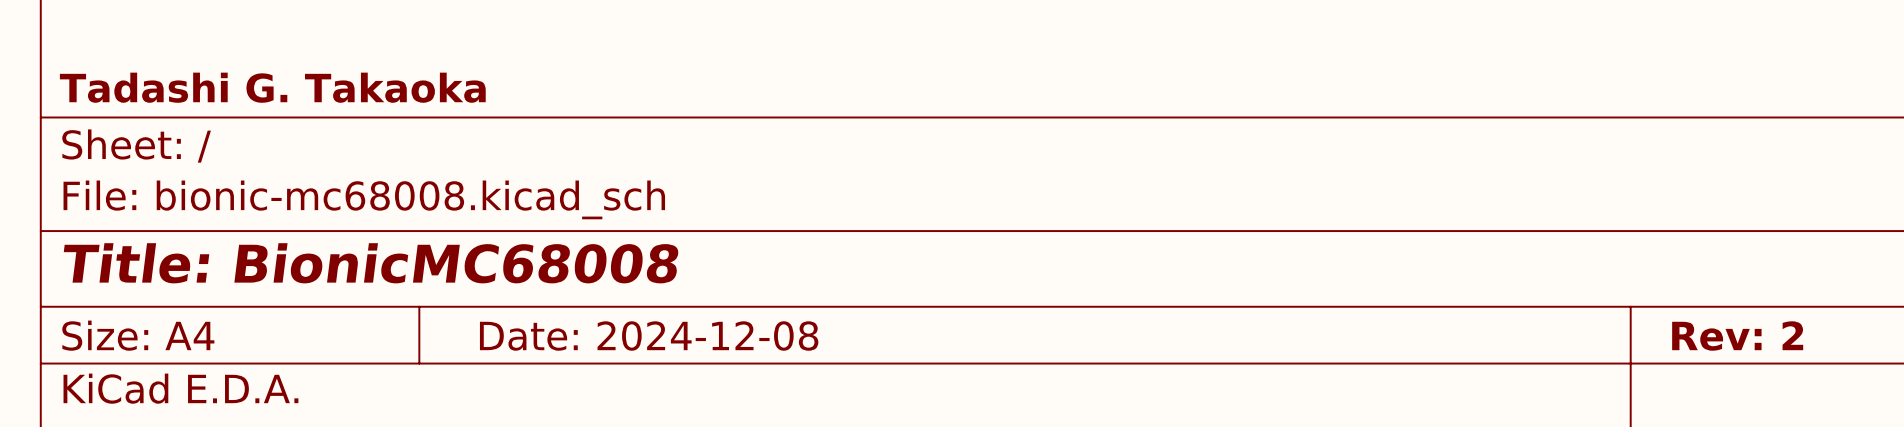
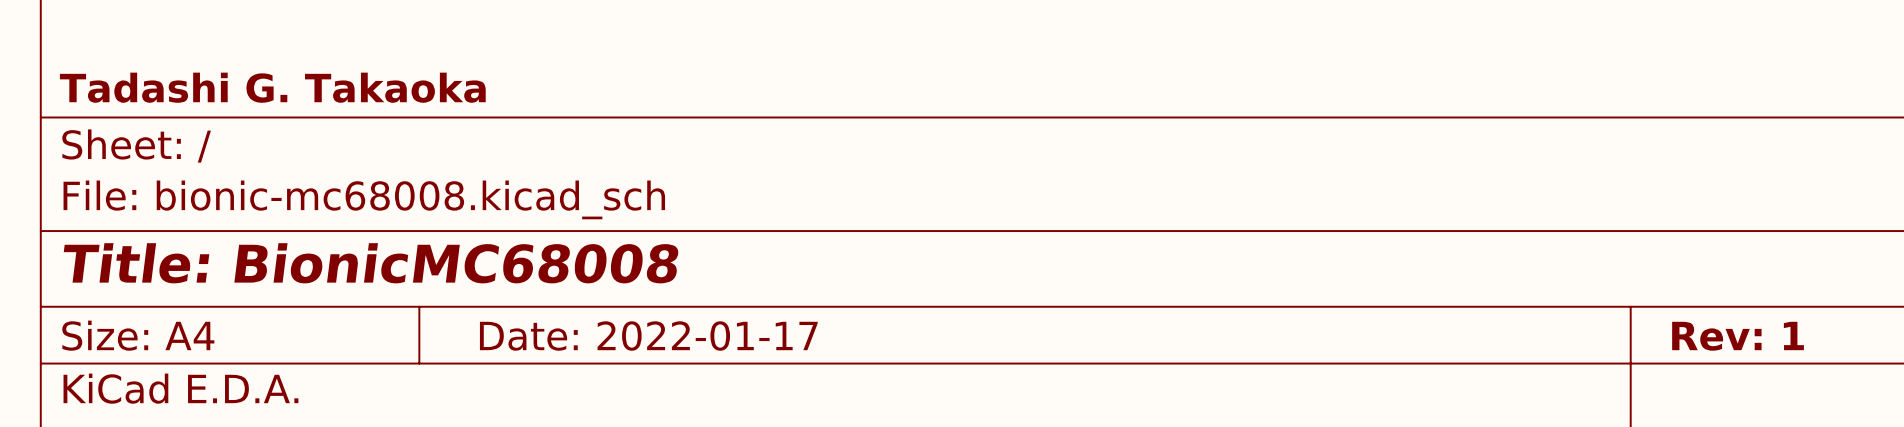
title block: Date: 2024-12-08 (649, 336) -> Date: 2022-01-17 (648, 336)
title block: Rev: 2 (1737, 336) -> Rev: 1 (1738, 336)

